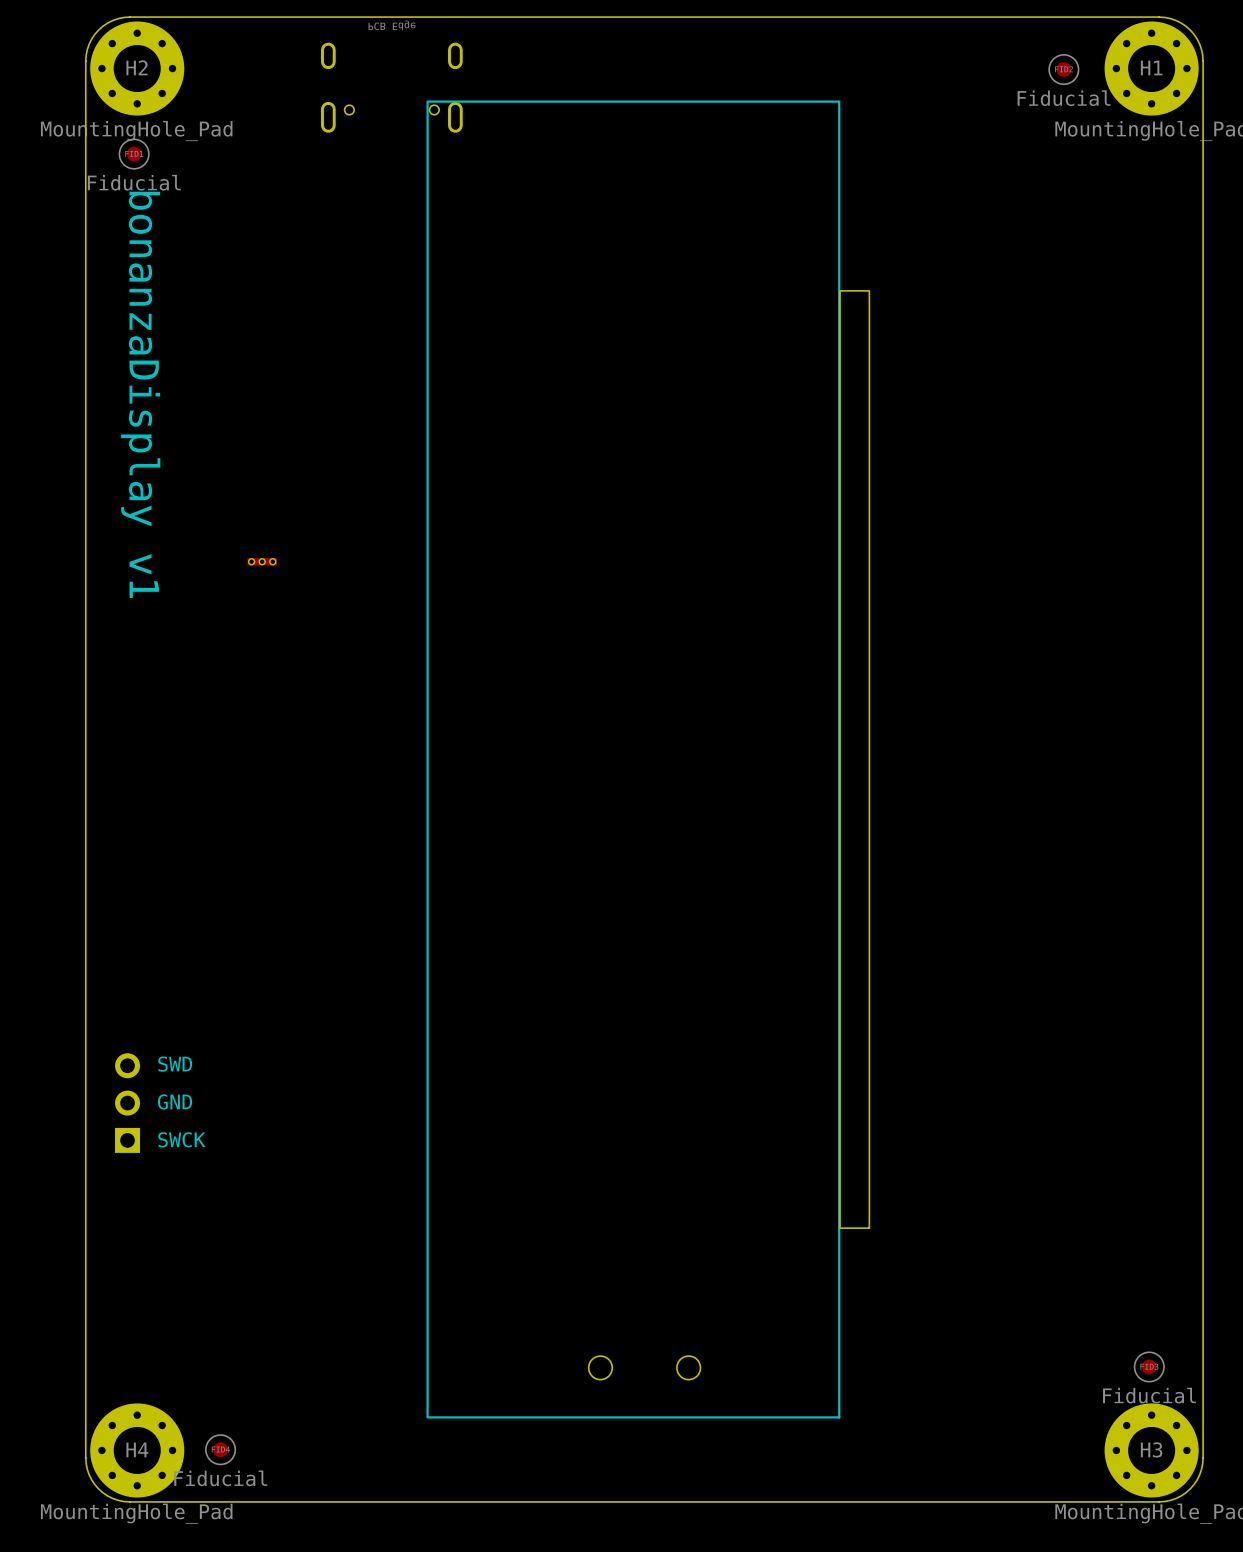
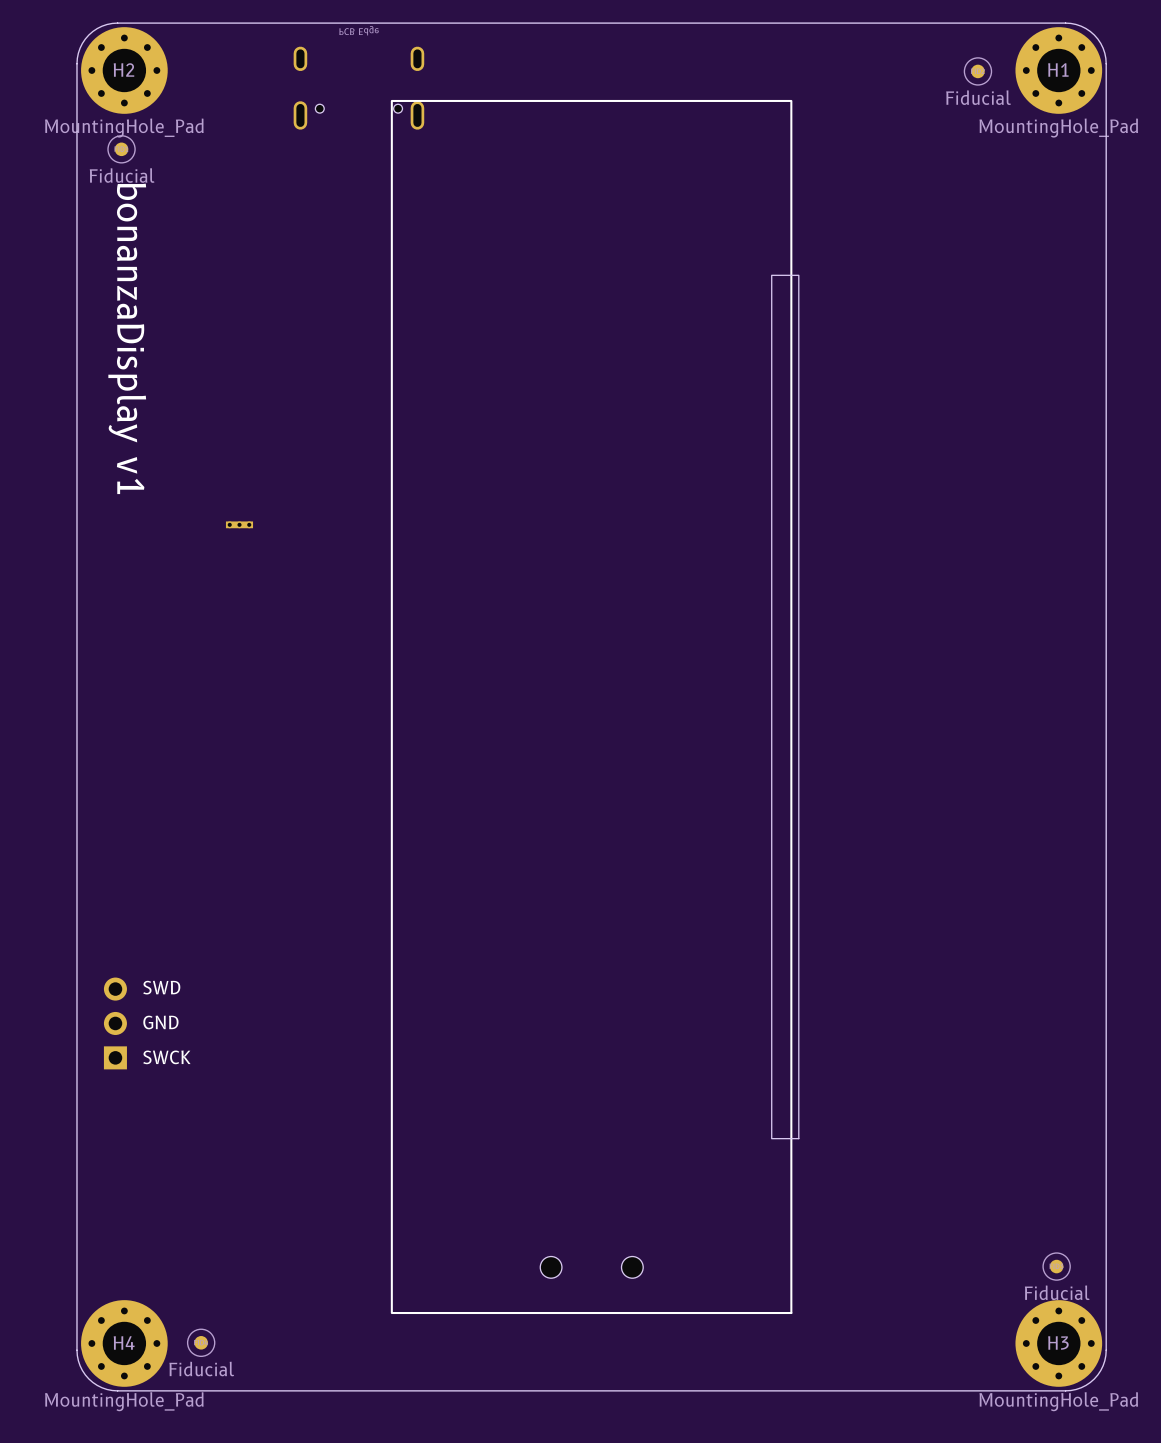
part footprint: [426, 100, 870, 1419] -> [390, 99, 800, 1315]

